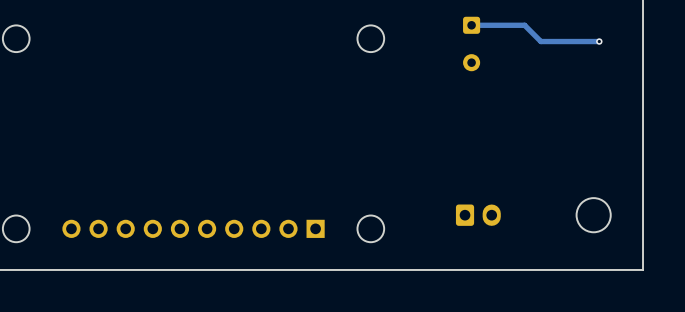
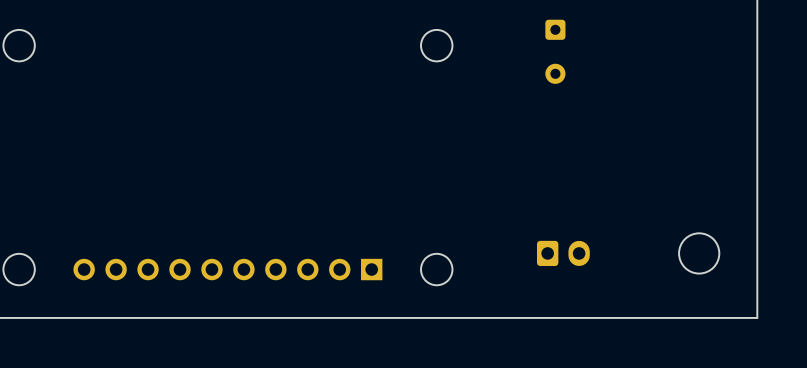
track: (471, 25) (524, 25) (540, 41) (599, 41) -> none
via: (599, 41) -> none

